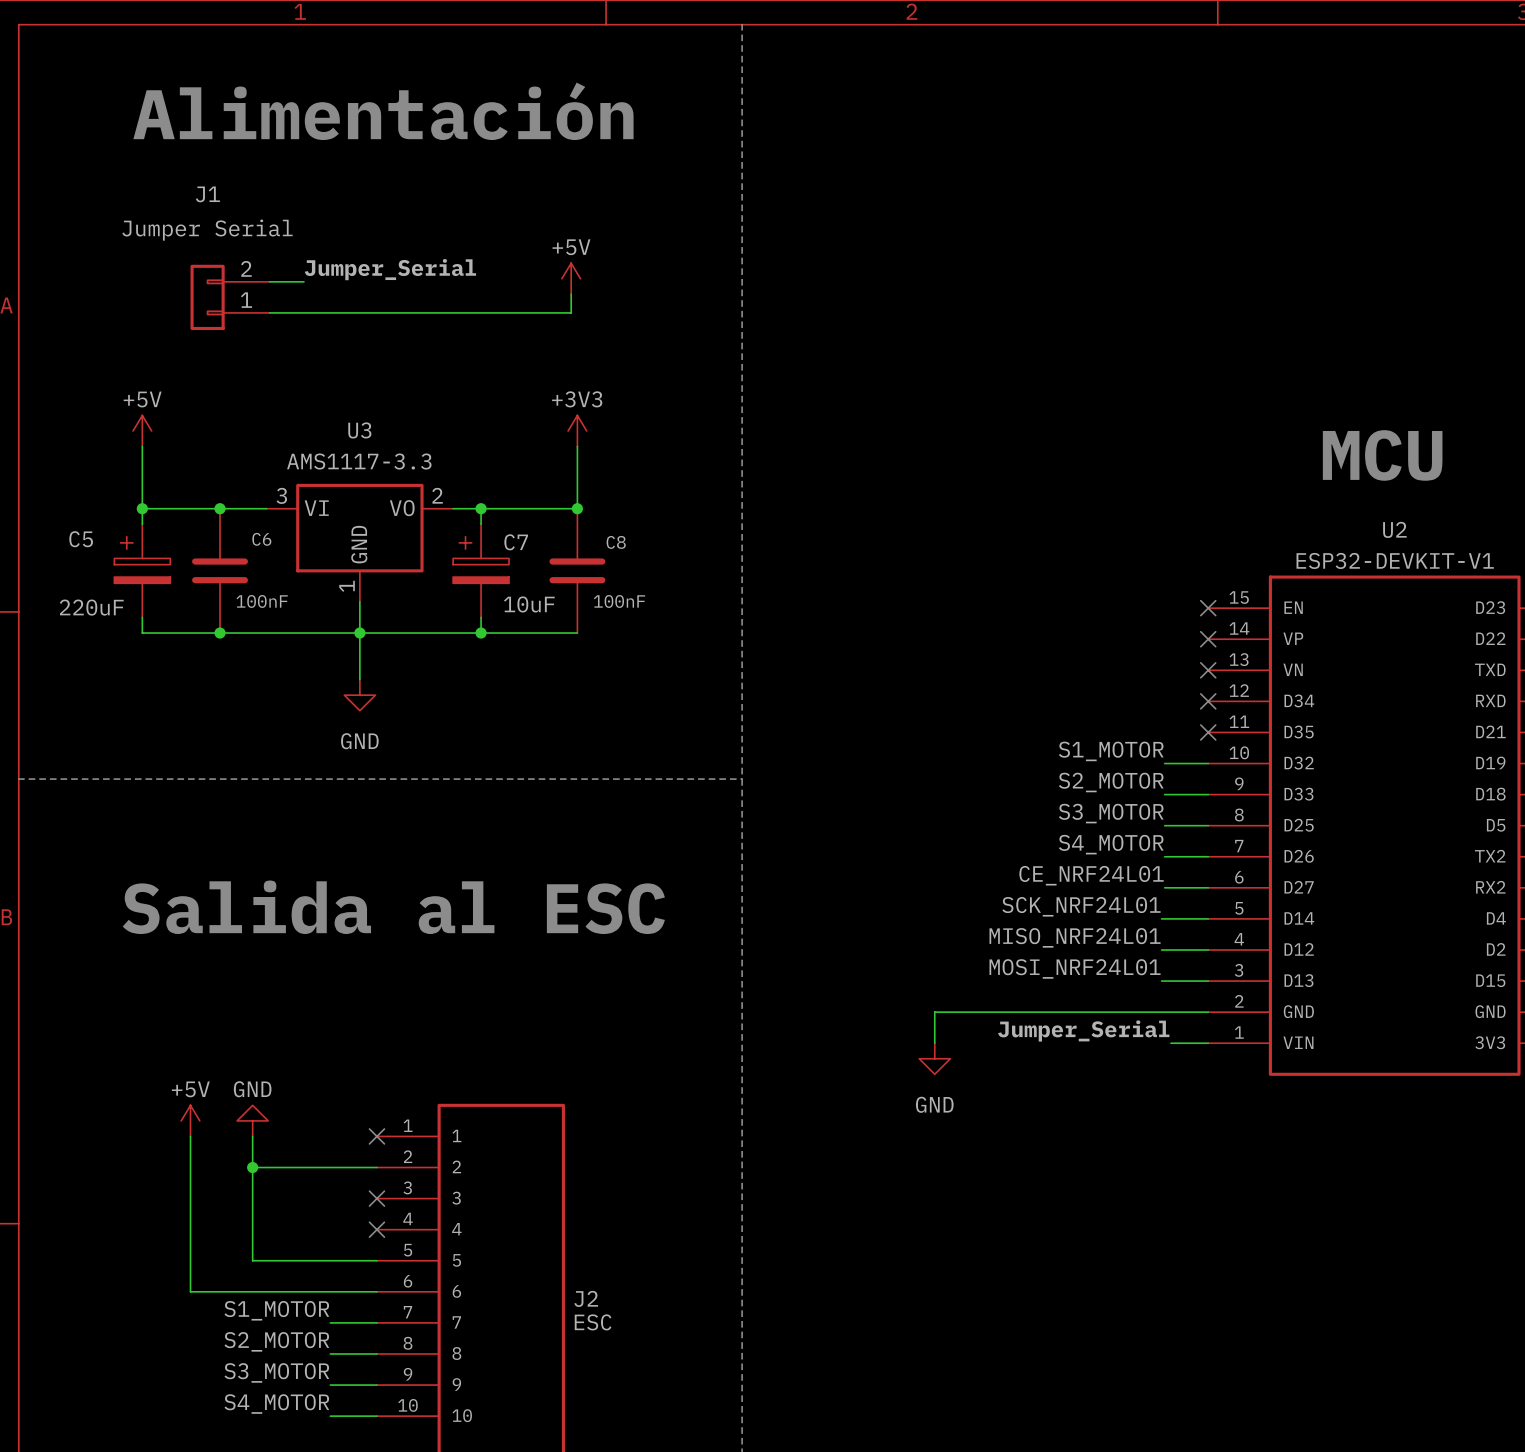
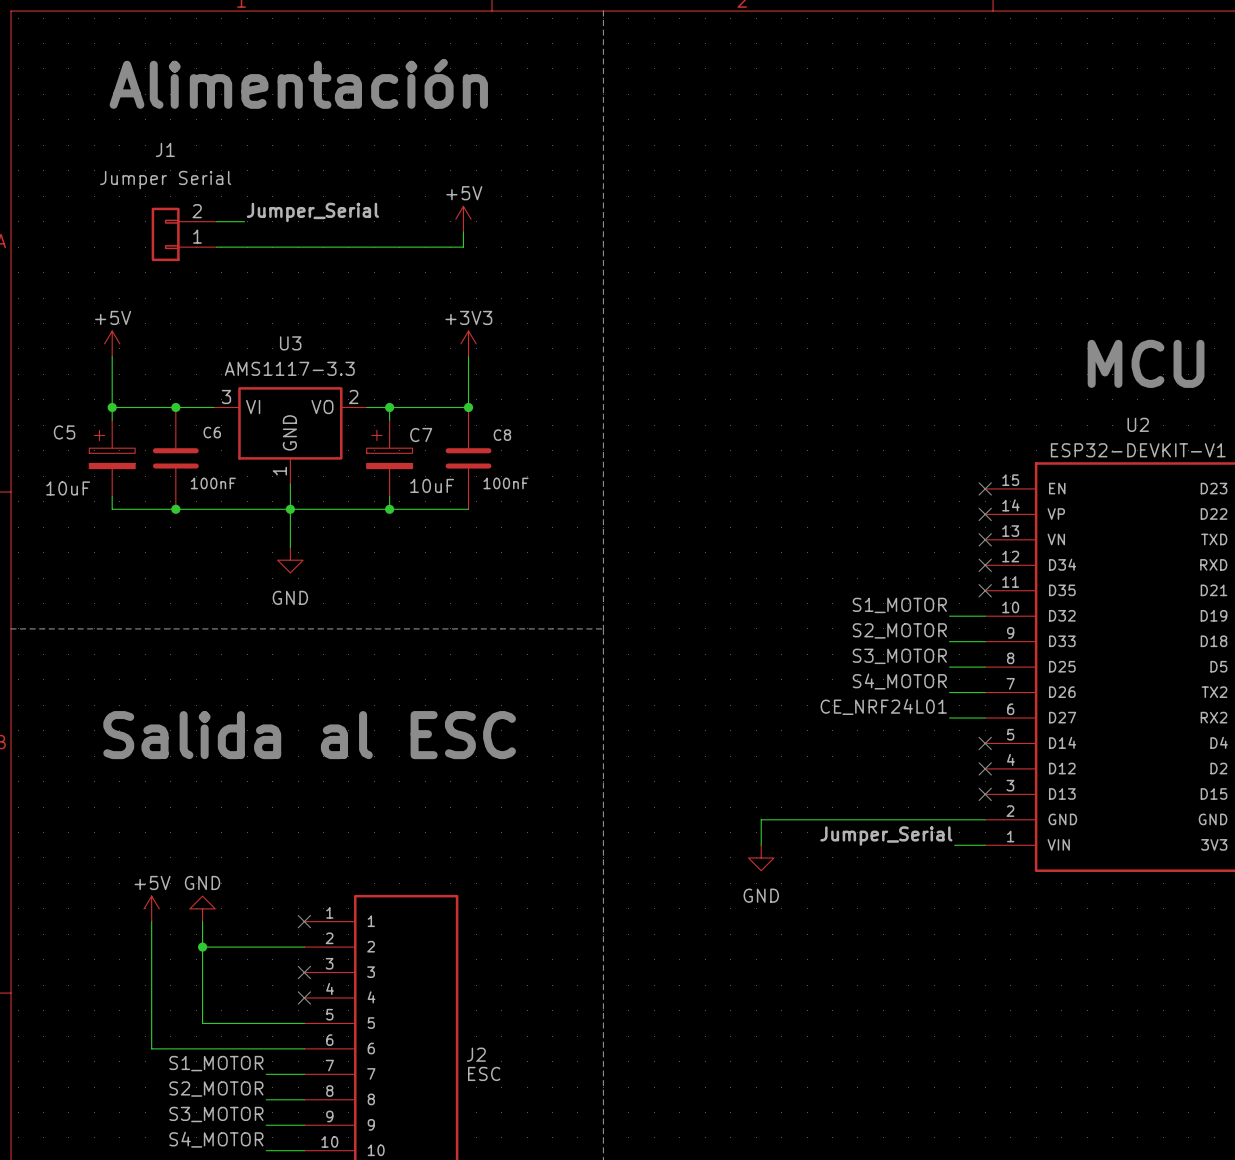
C5 value: 220uF (91, 607) -> 10uF (68, 488)
label: SCK_NRF24L01 (1081, 906) -> none
wire: (1161, 918) (1208, 918) -> none
no-connect mark: none -> (985, 743)
label: MISO_NRF24L01 (1075, 937) -> none
wire: (1161, 949) (1208, 949) -> none
no-connect mark: none -> (985, 768)
label: MOSI_NRF24L01 (1075, 968) -> none
wire: (1161, 981) (1208, 981) -> none
no-connect mark: none -> (985, 794)

